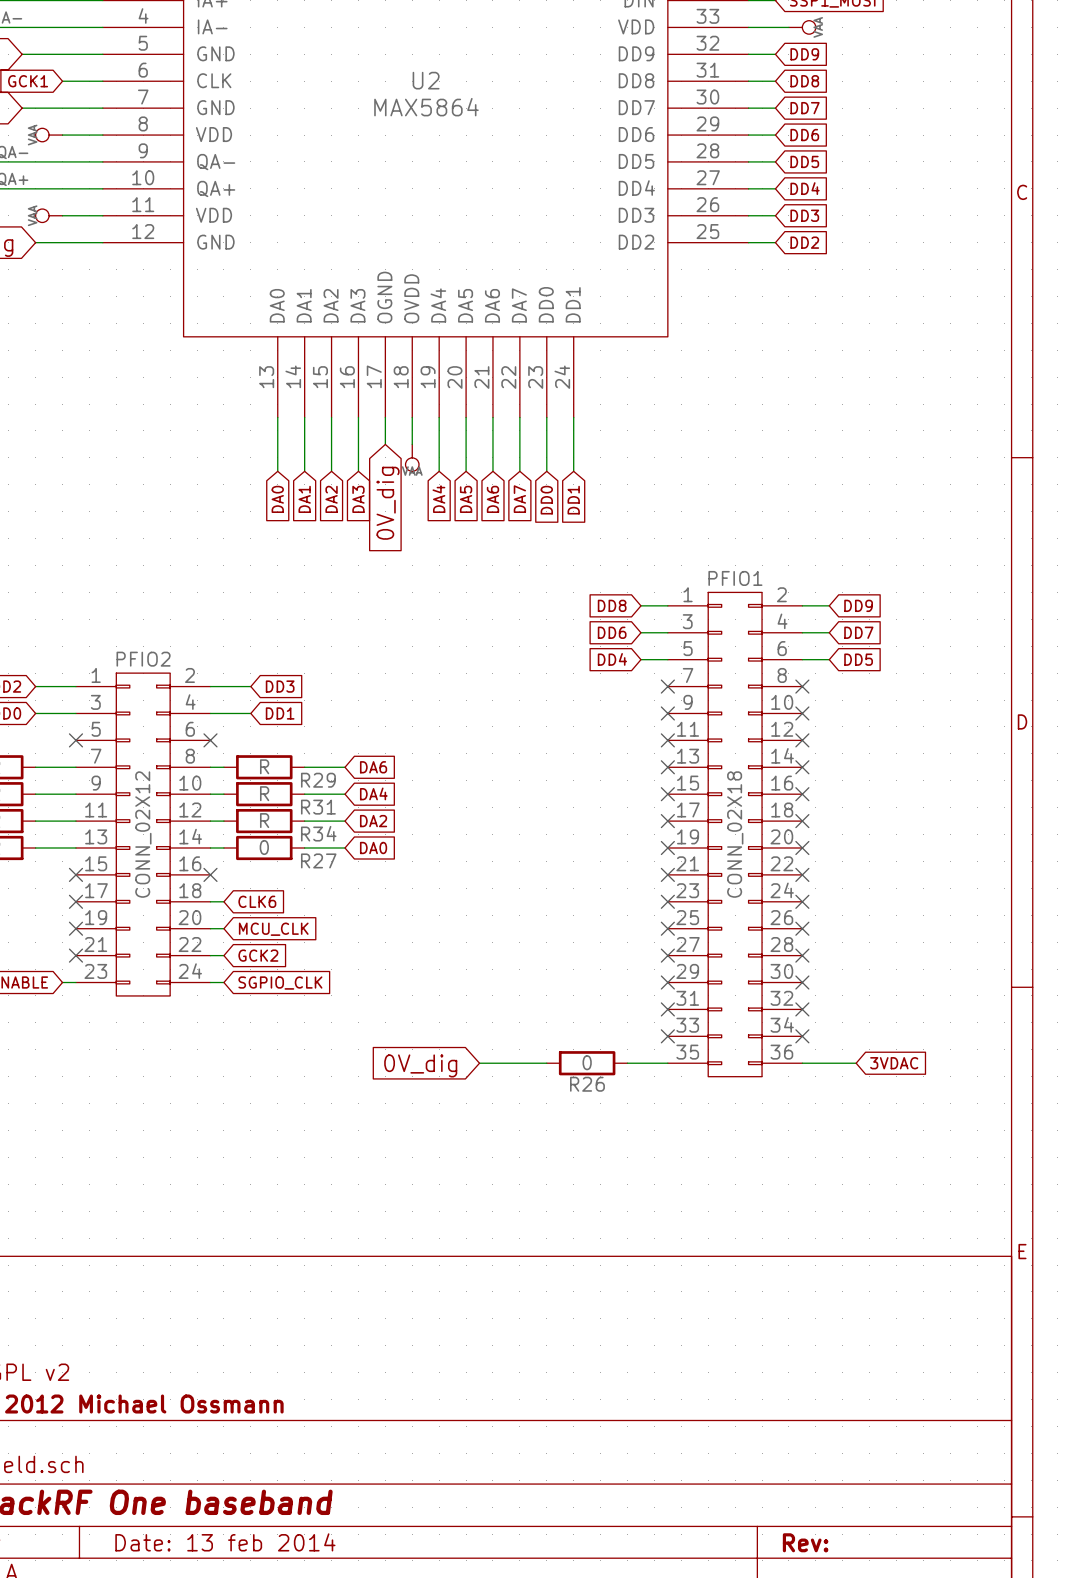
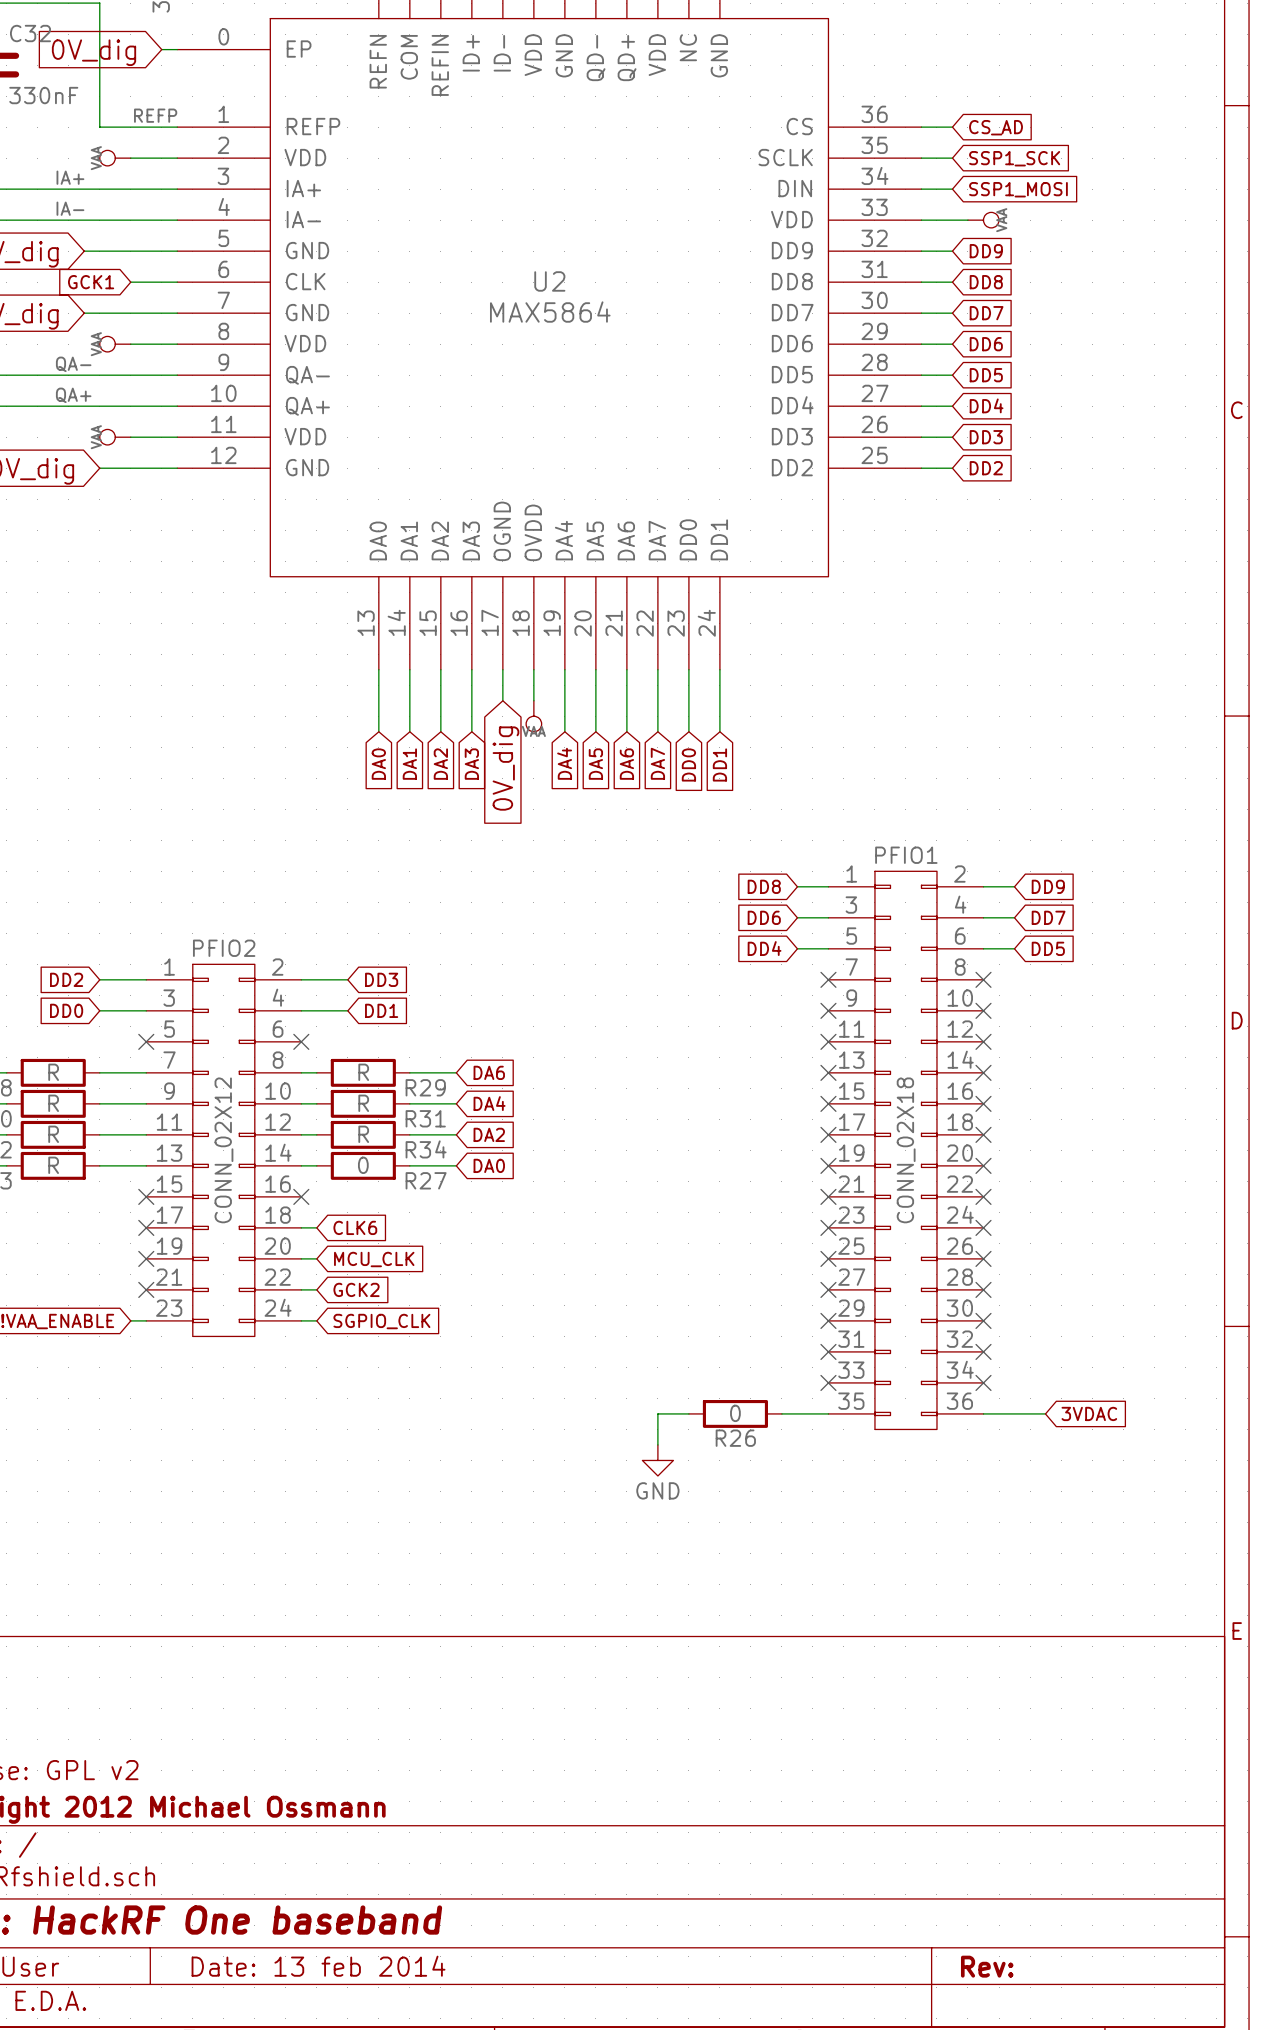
wire: (479, 1063) (519, 1063) -> (657, 1444) (657, 1413)
global label: 0V_dig (420, 1065) -> none
power symbol: none -> GND (657, 1460)

